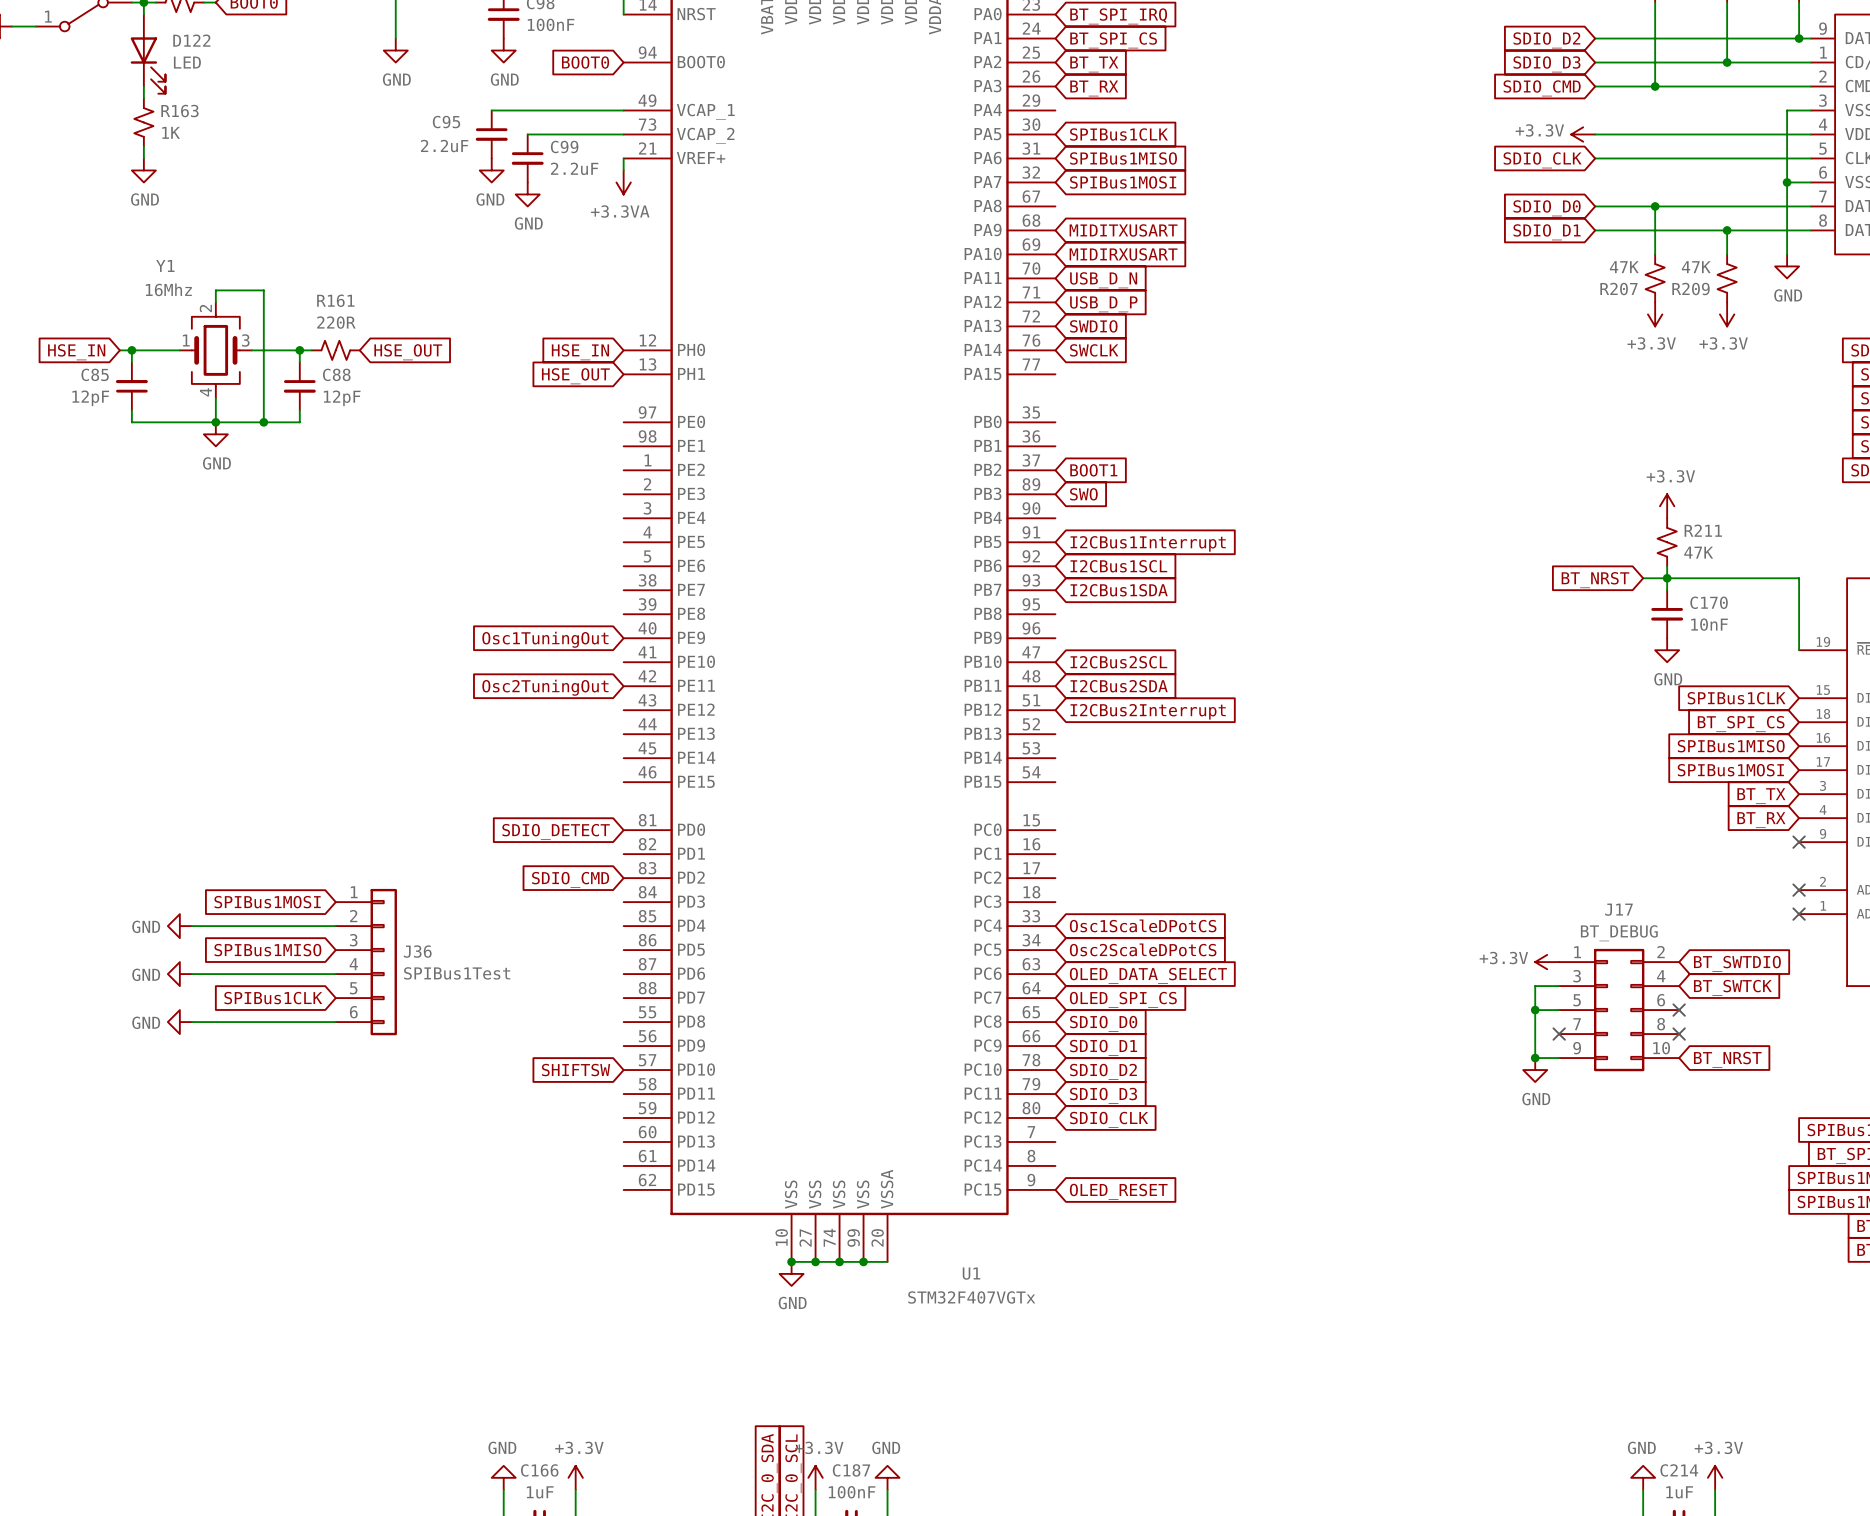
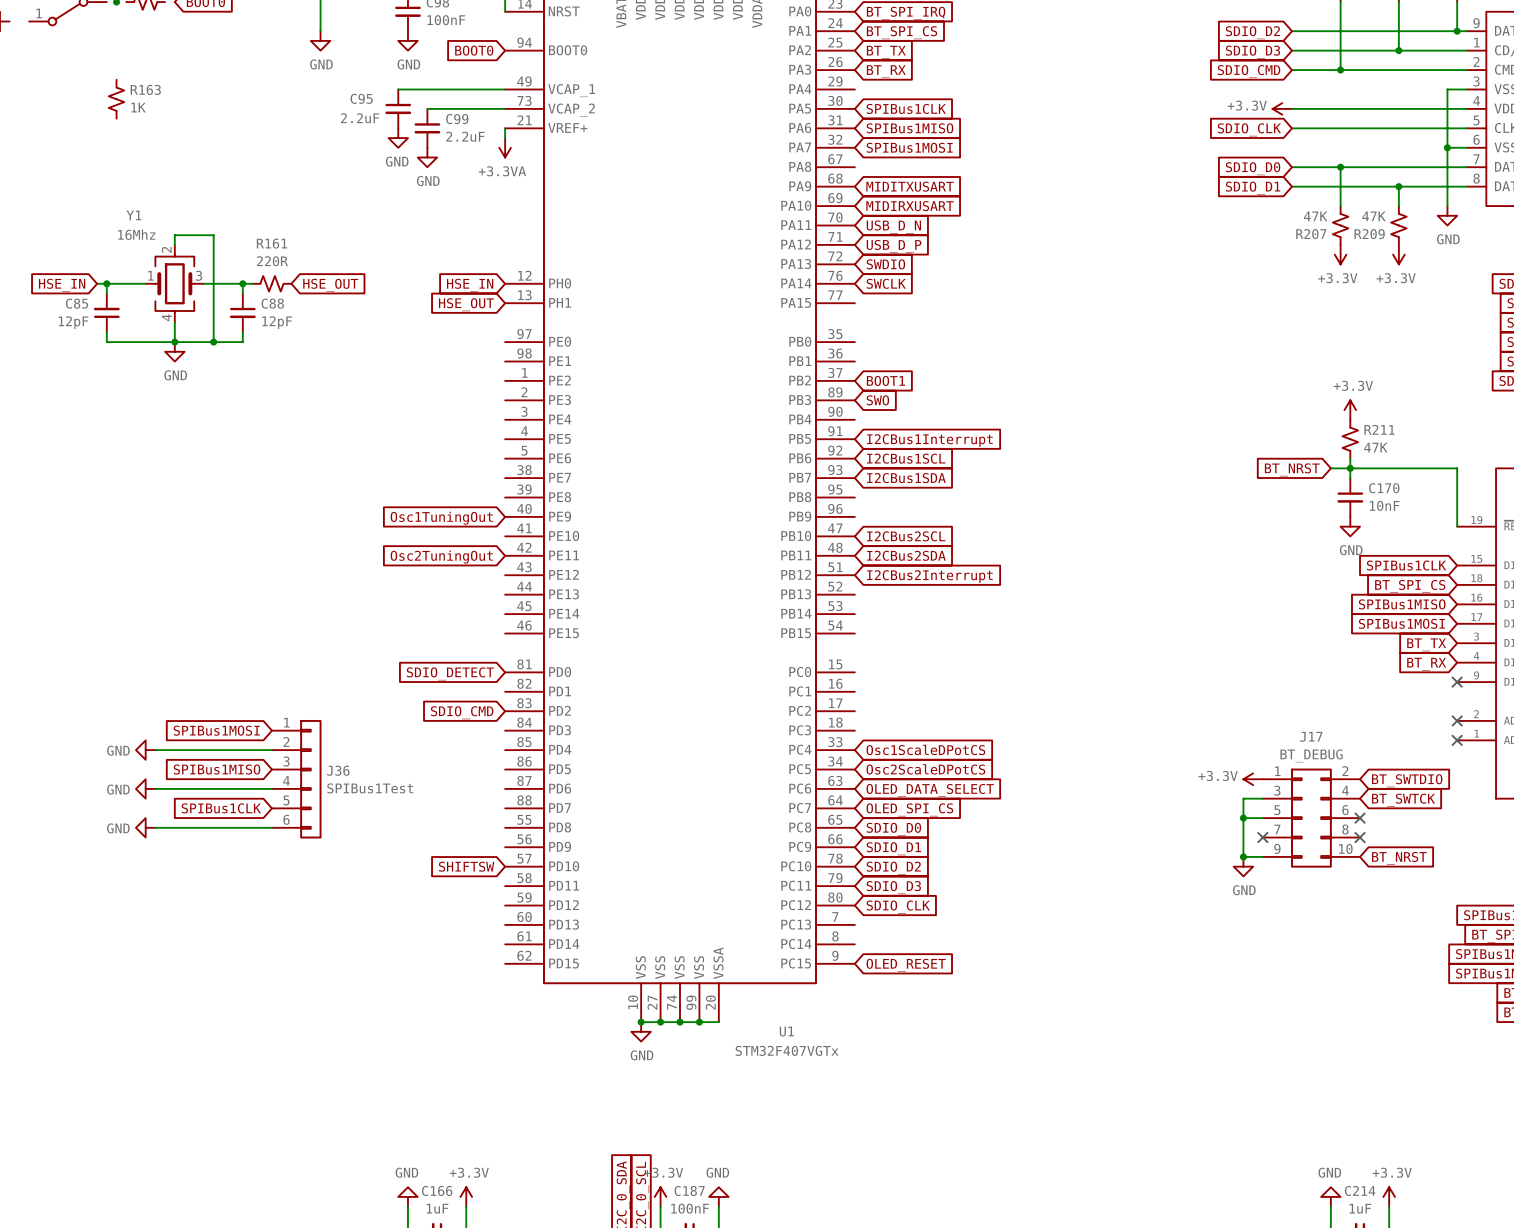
wire: (131, 2) (155, 2) -> none
wire: (143, 2) (143, 14) -> none
wire: (203, 2) (215, 2) -> none
wire: (11, 26) (35, 26) -> none
D122: LED (148, 54) -> none
wire: (143, 86) (143, 98) -> none
wire: (143, 146) (143, 158) -> none
power symbol: GND (143, 170) -> none

